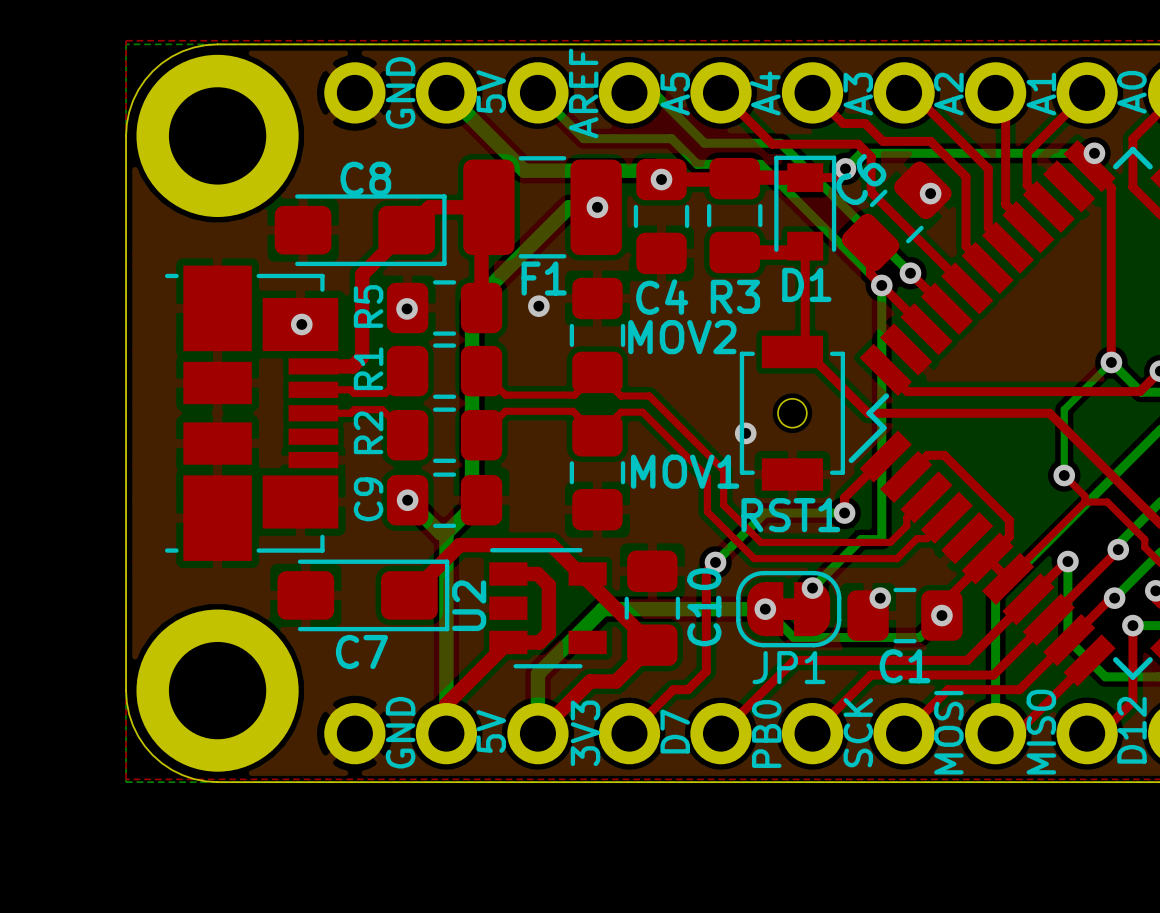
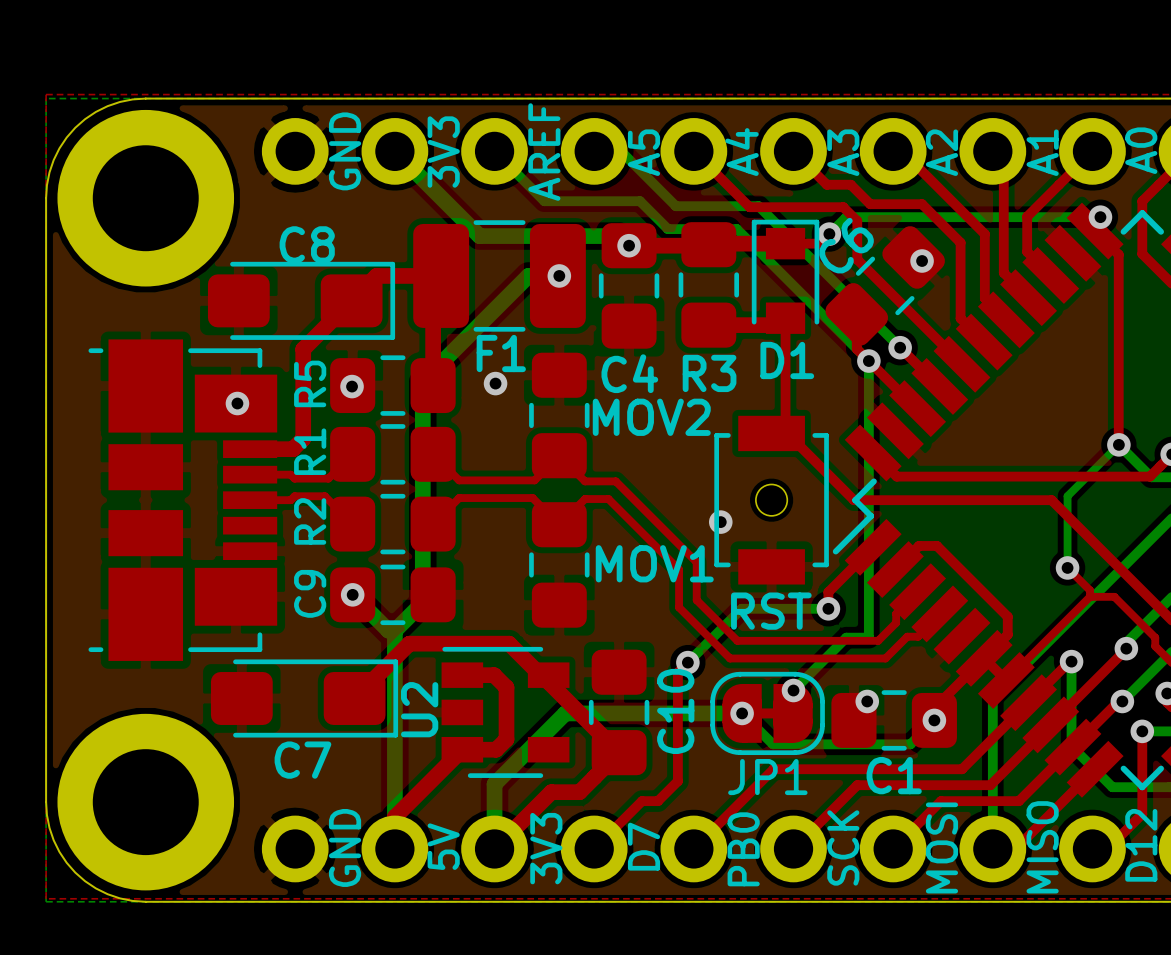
text: 5V (491, 91) -> 3V3 (443, 152)
RST1 name: RST1 (790, 515) -> RST (771, 611)
JP1 footprint: [736, 570, 842, 648] -> [710, 671, 825, 756]

